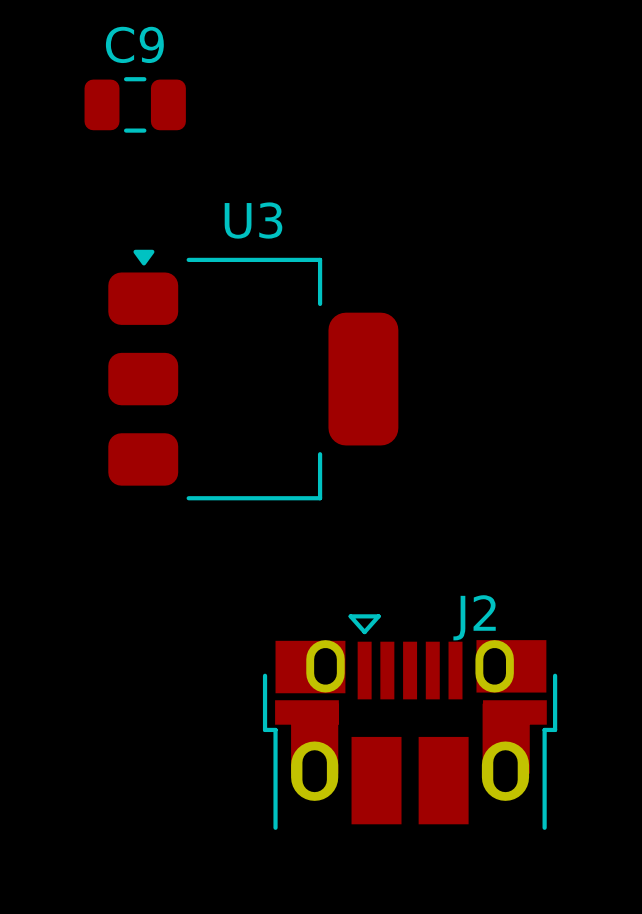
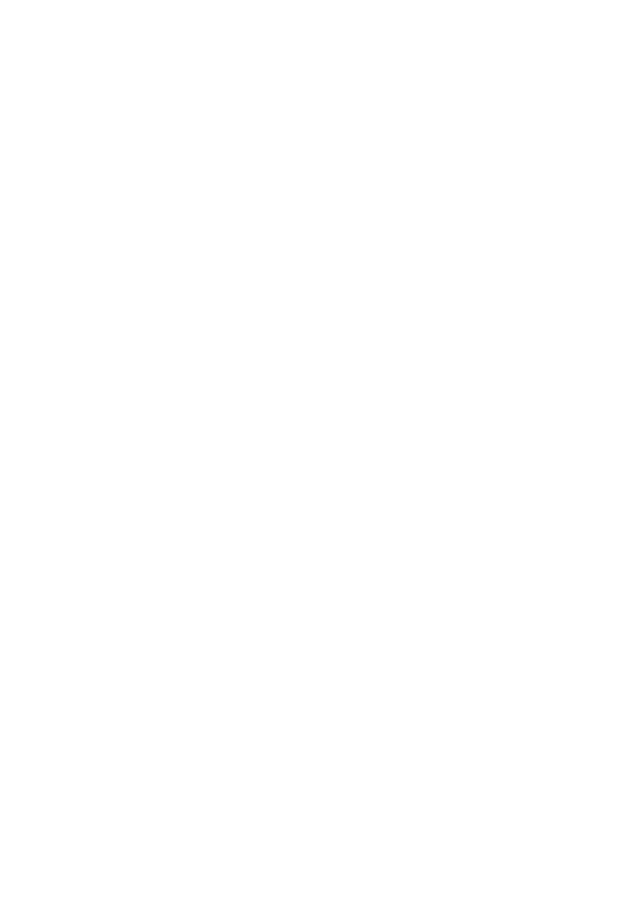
C9: (135, 104) -> none
U3: (253, 375) -> none
J2: (410, 722) -> none

